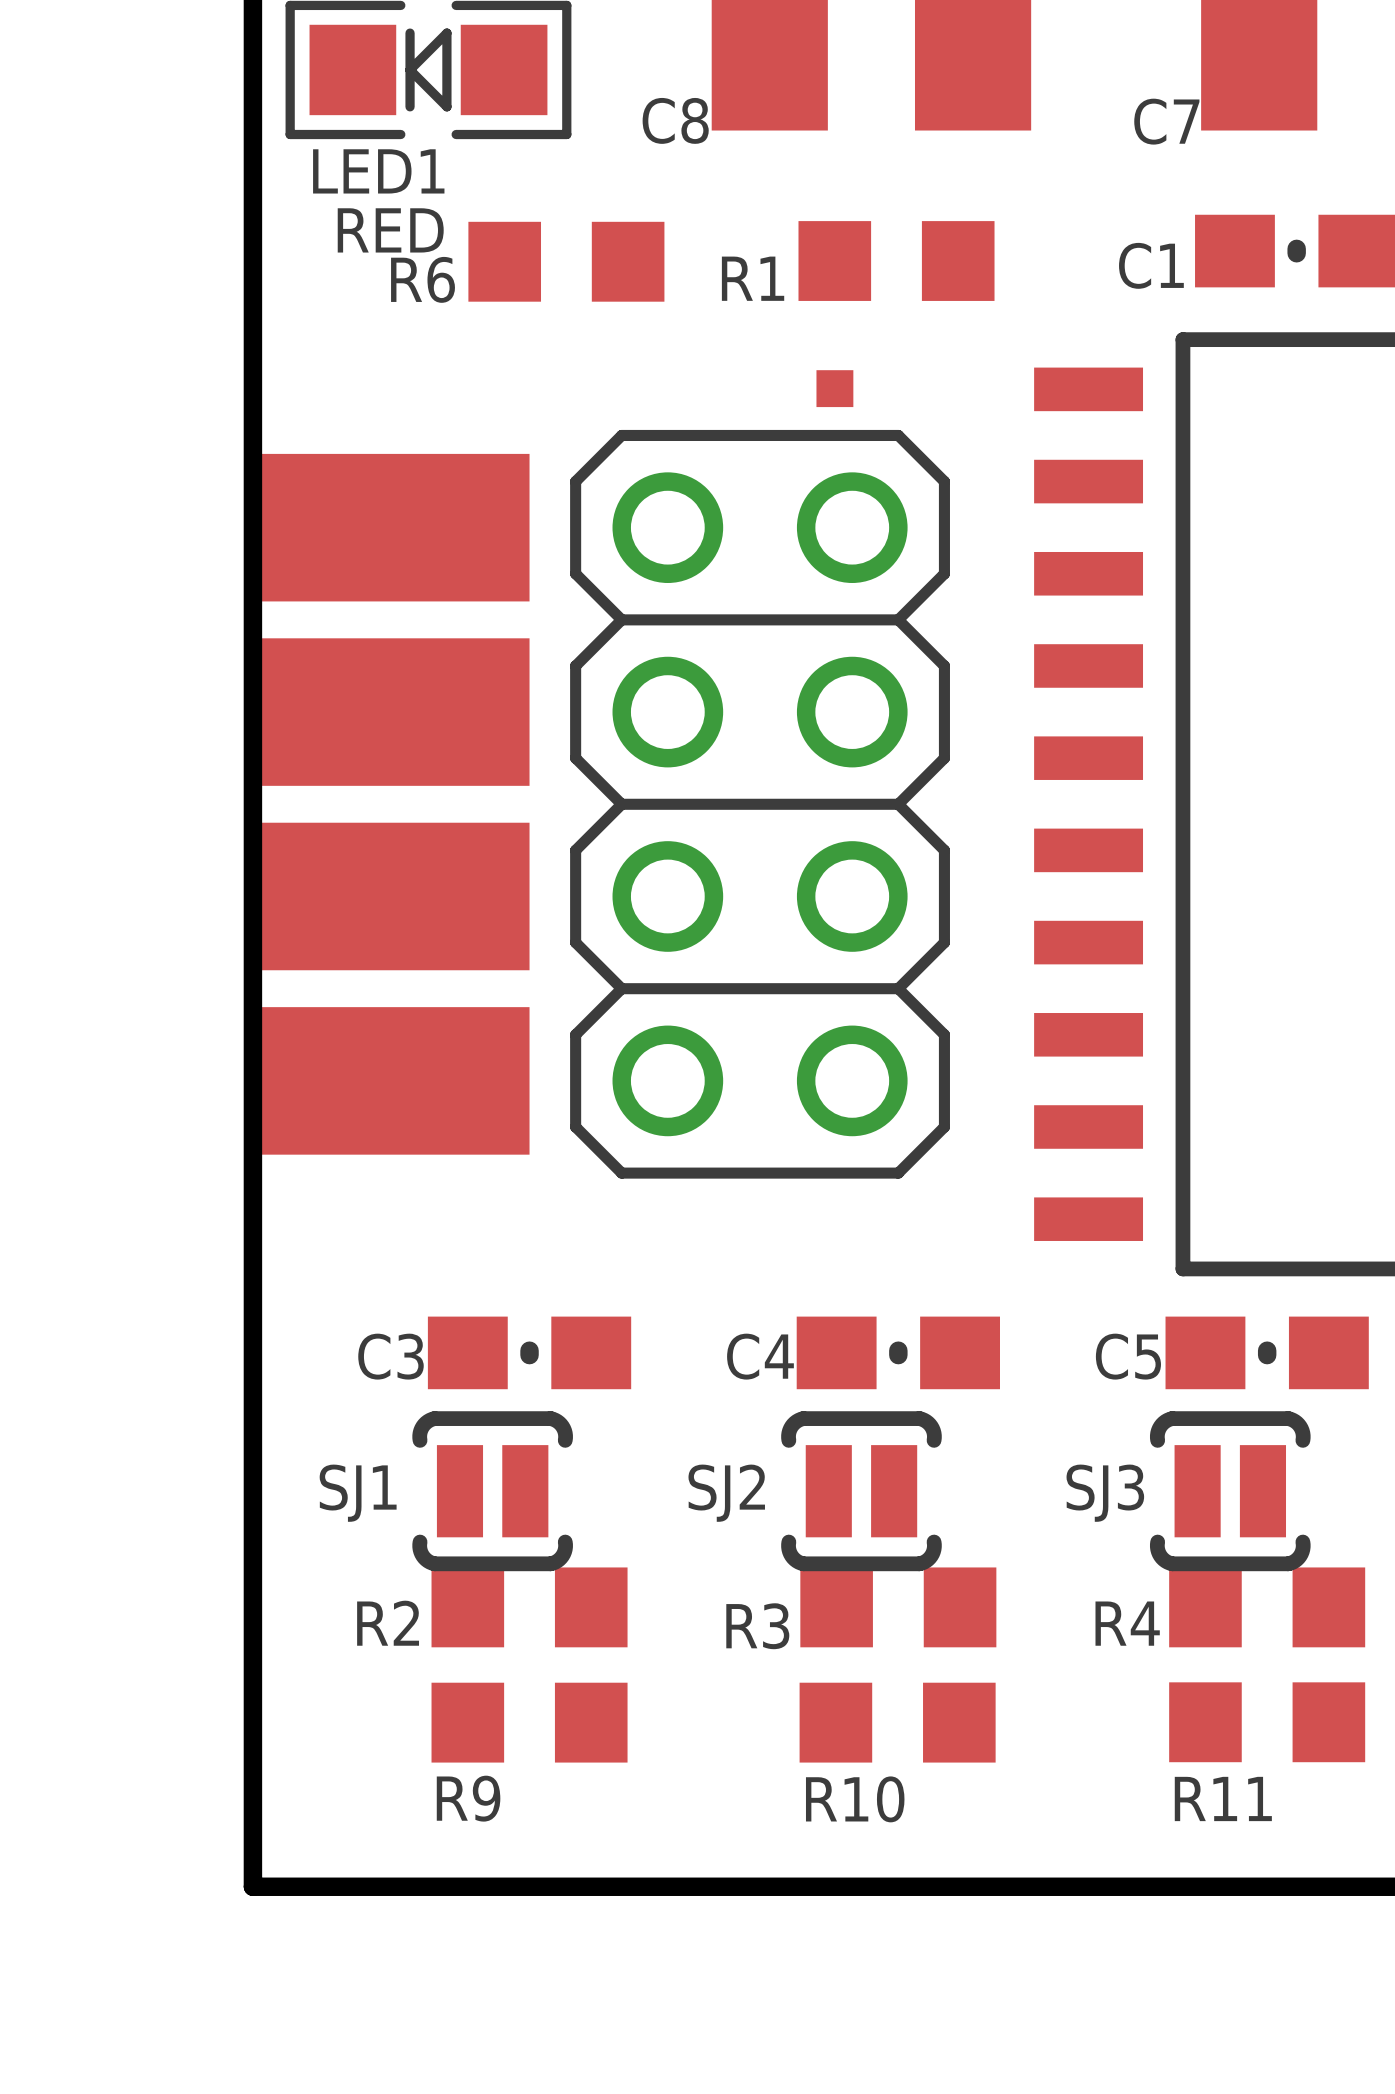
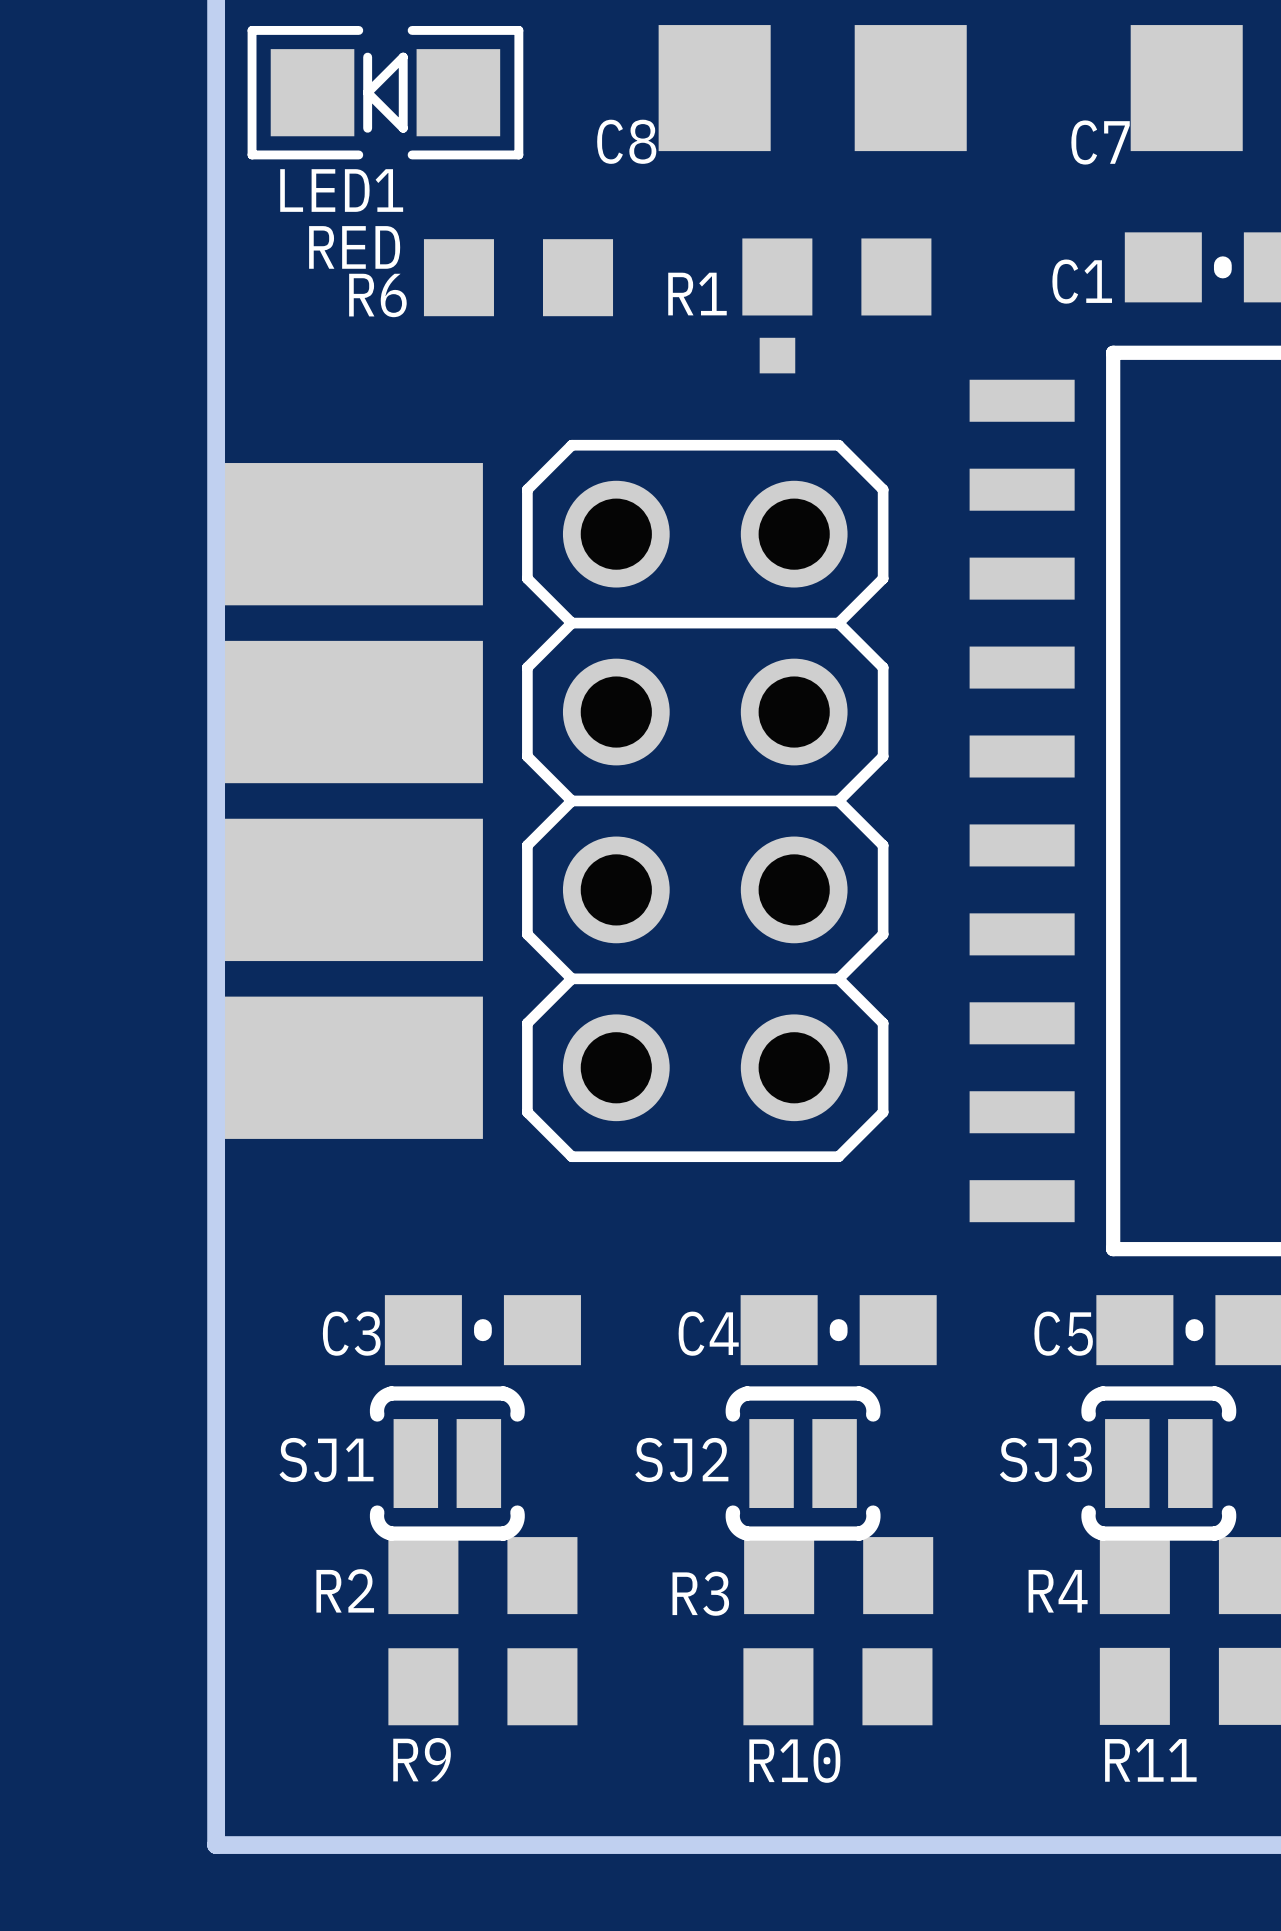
part position: (834, 388) -> (777, 355)

